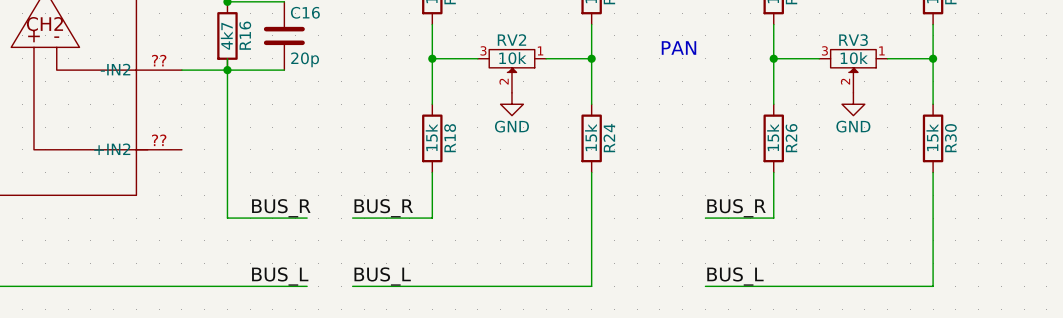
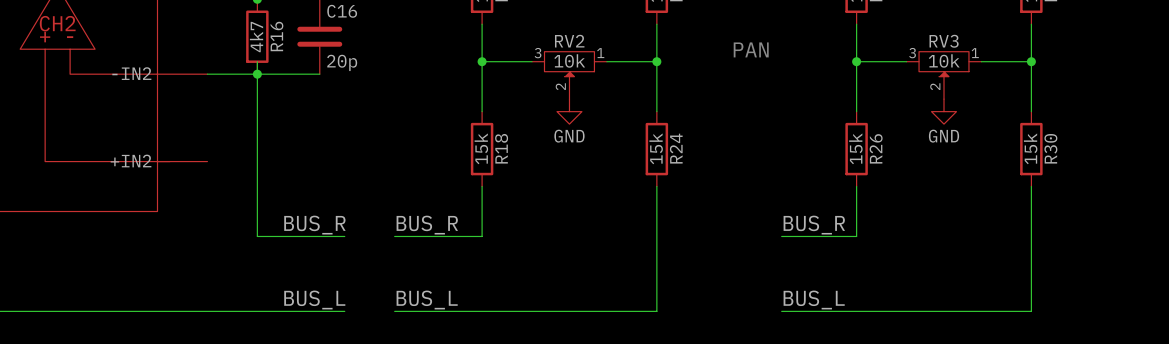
part pin number: ?? (159, 60) -> none
part pin number: ?? (159, 140) -> none

